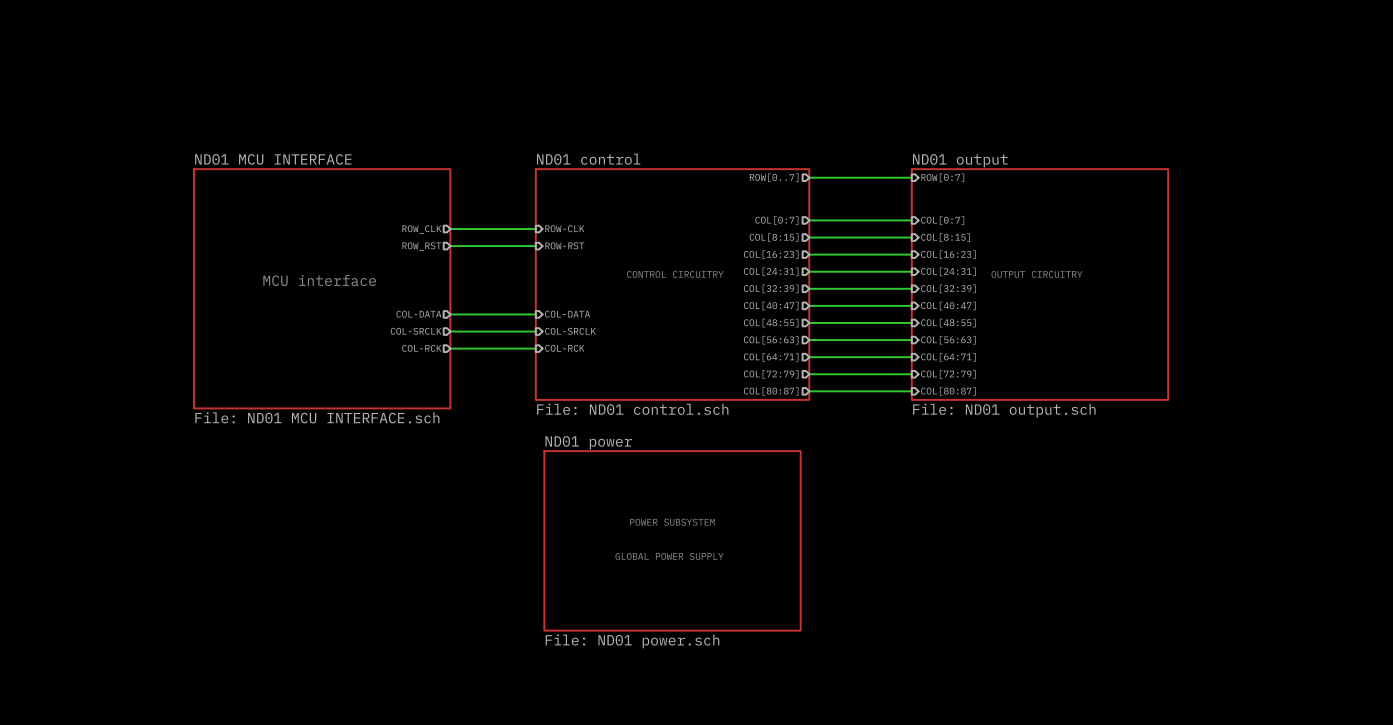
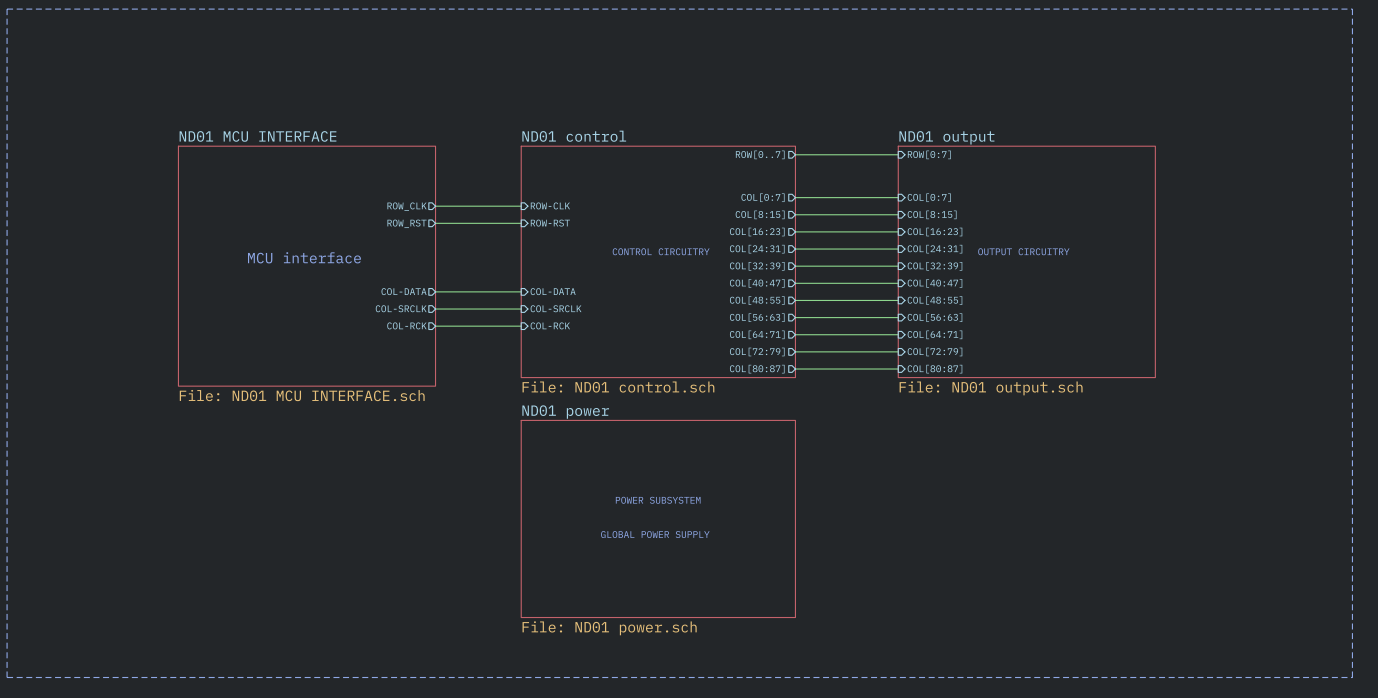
line: none -> (7, 9) (7, 677) (1352, 677) (1352, 9) (7, 9)
sheet ND01 power shape: [544, 451, 801, 631] -> [521, 420, 796, 618]

